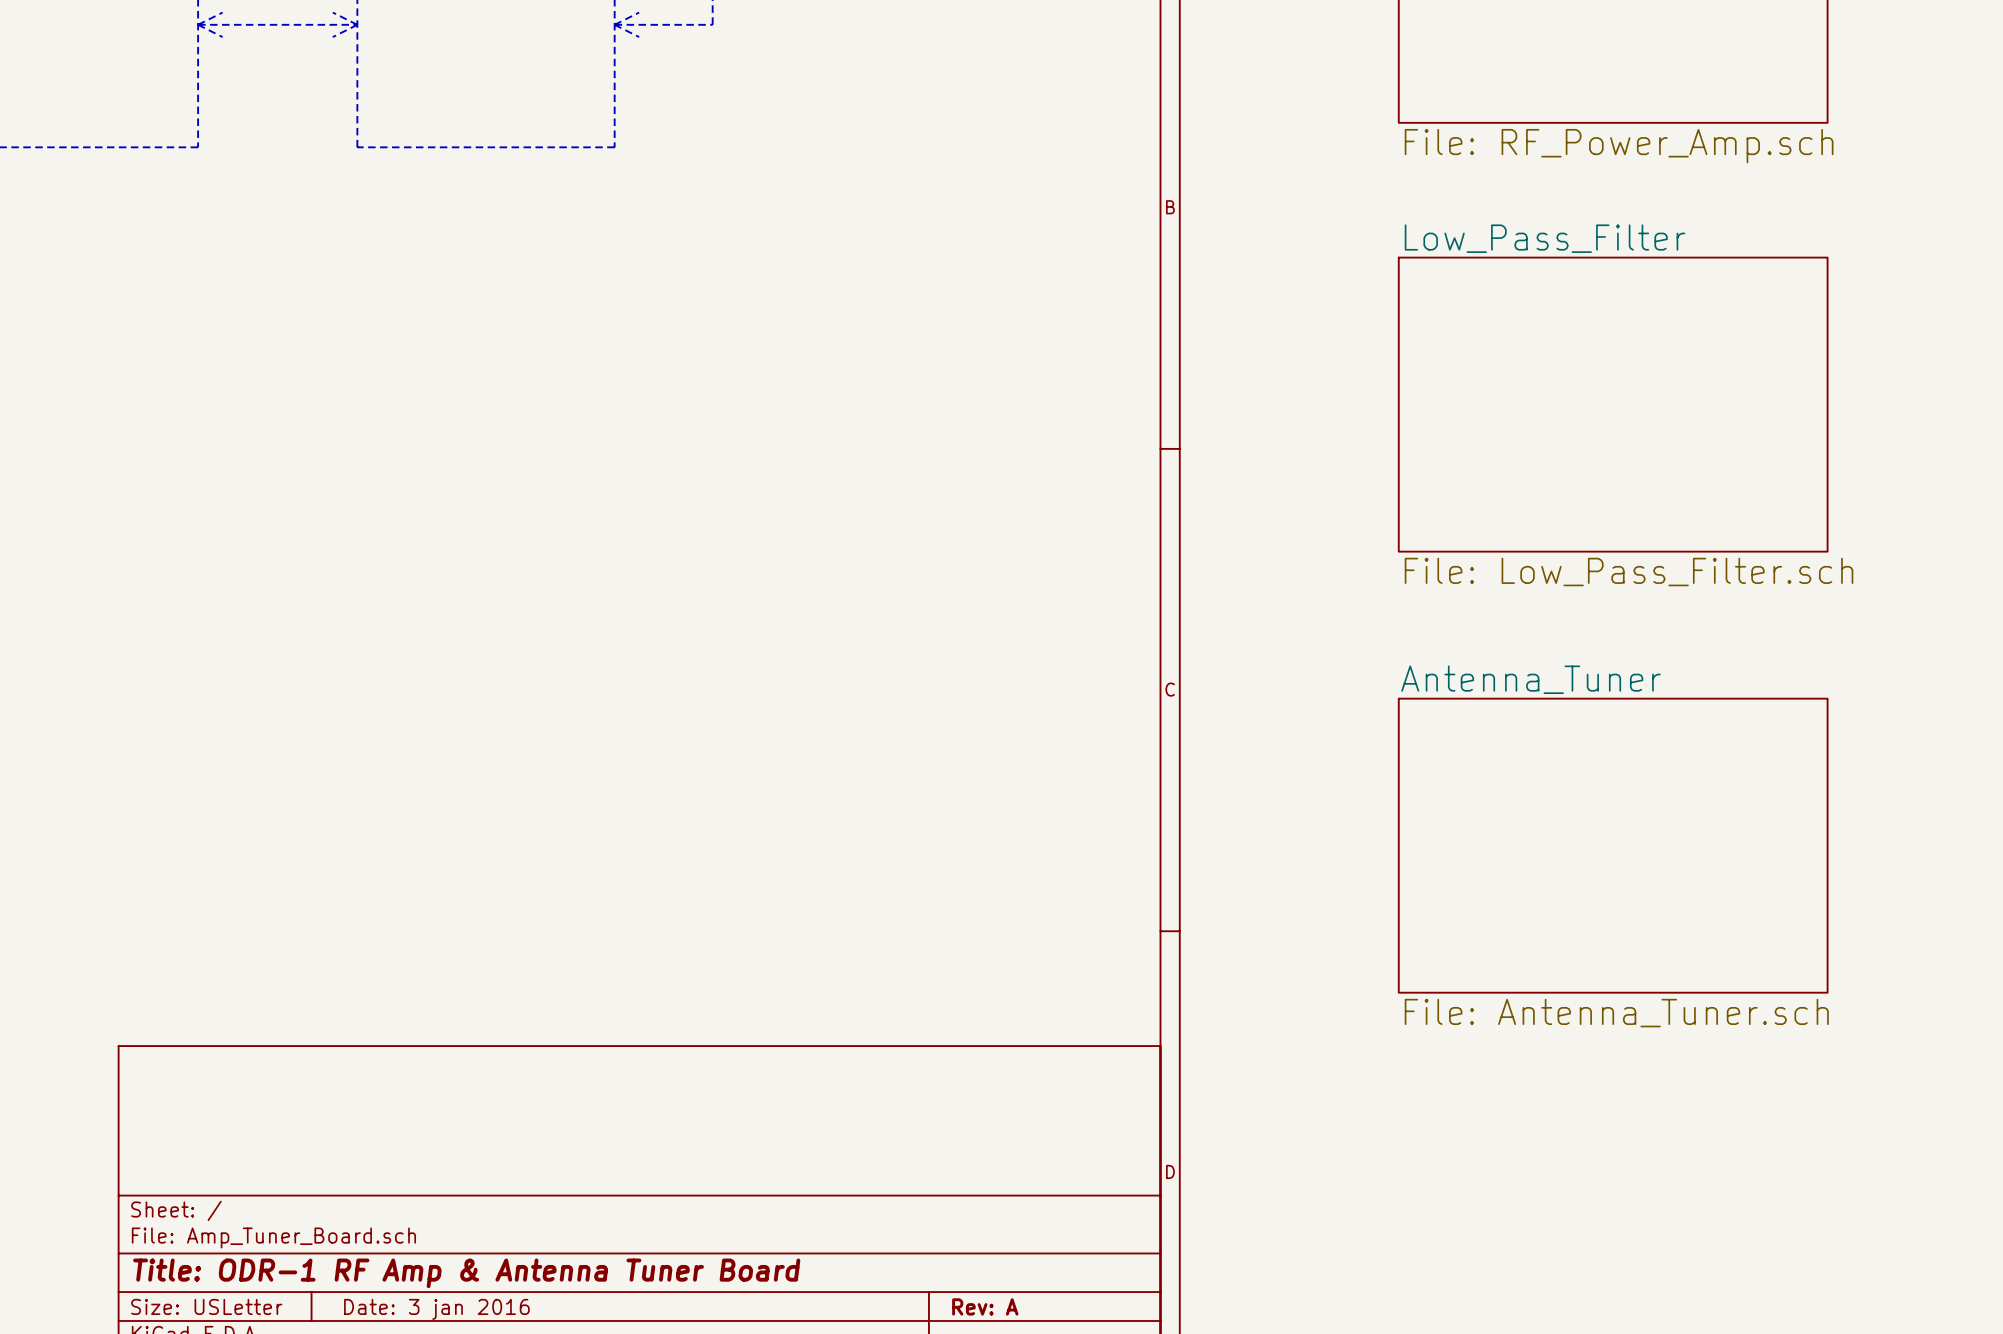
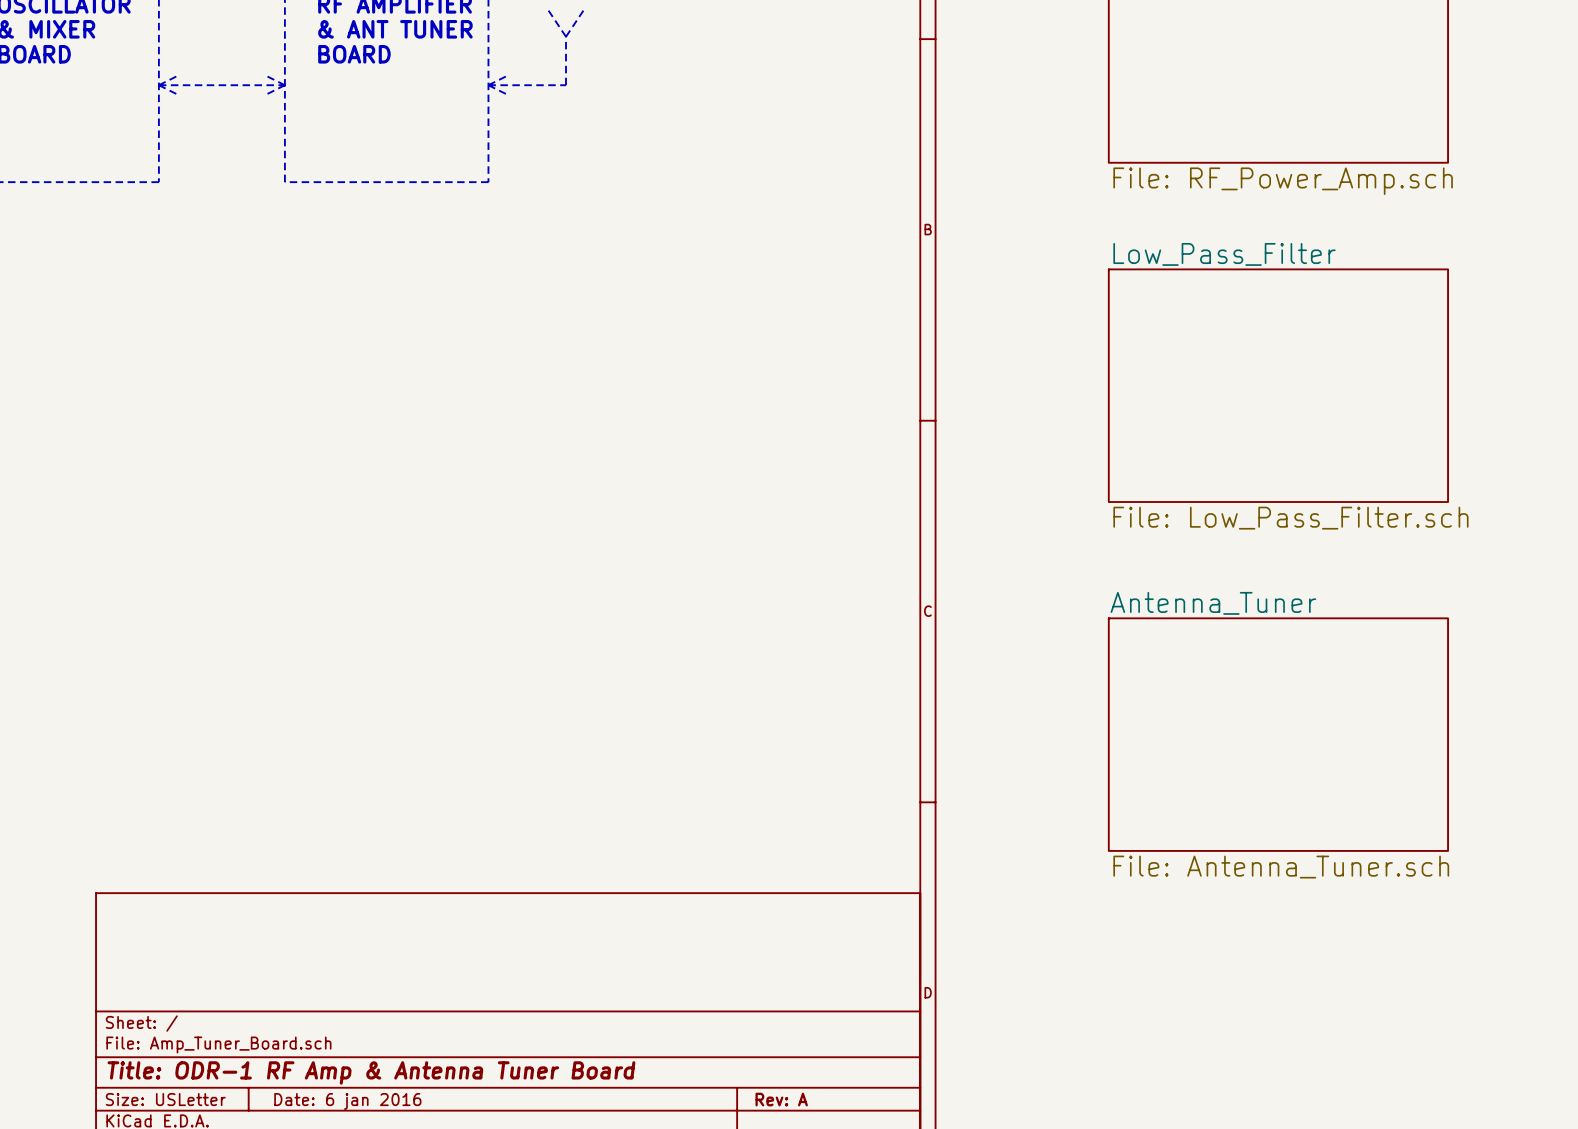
title block: Date: 3 jan 2016 (436, 1309) -> Date: 6 jan 2016 (347, 1101)

